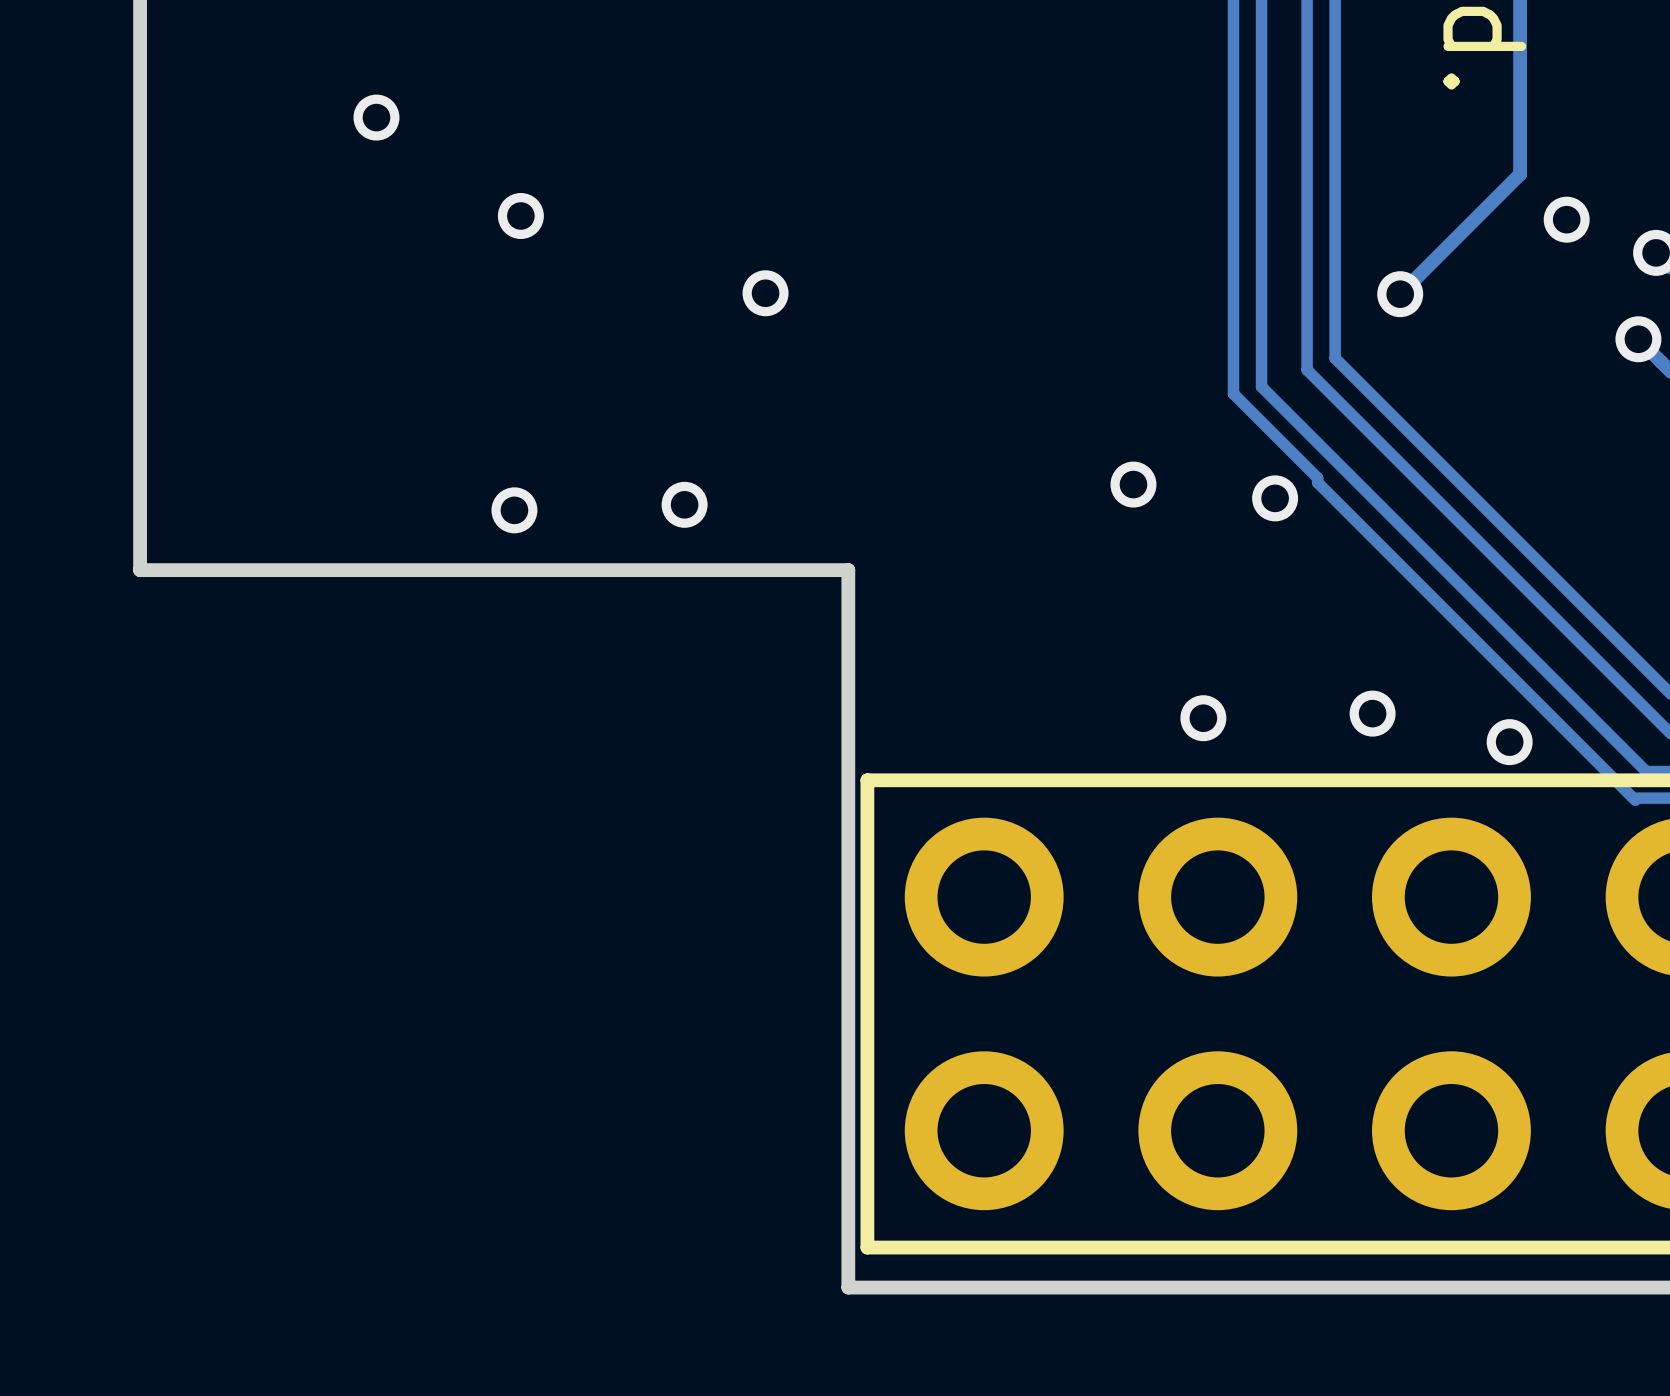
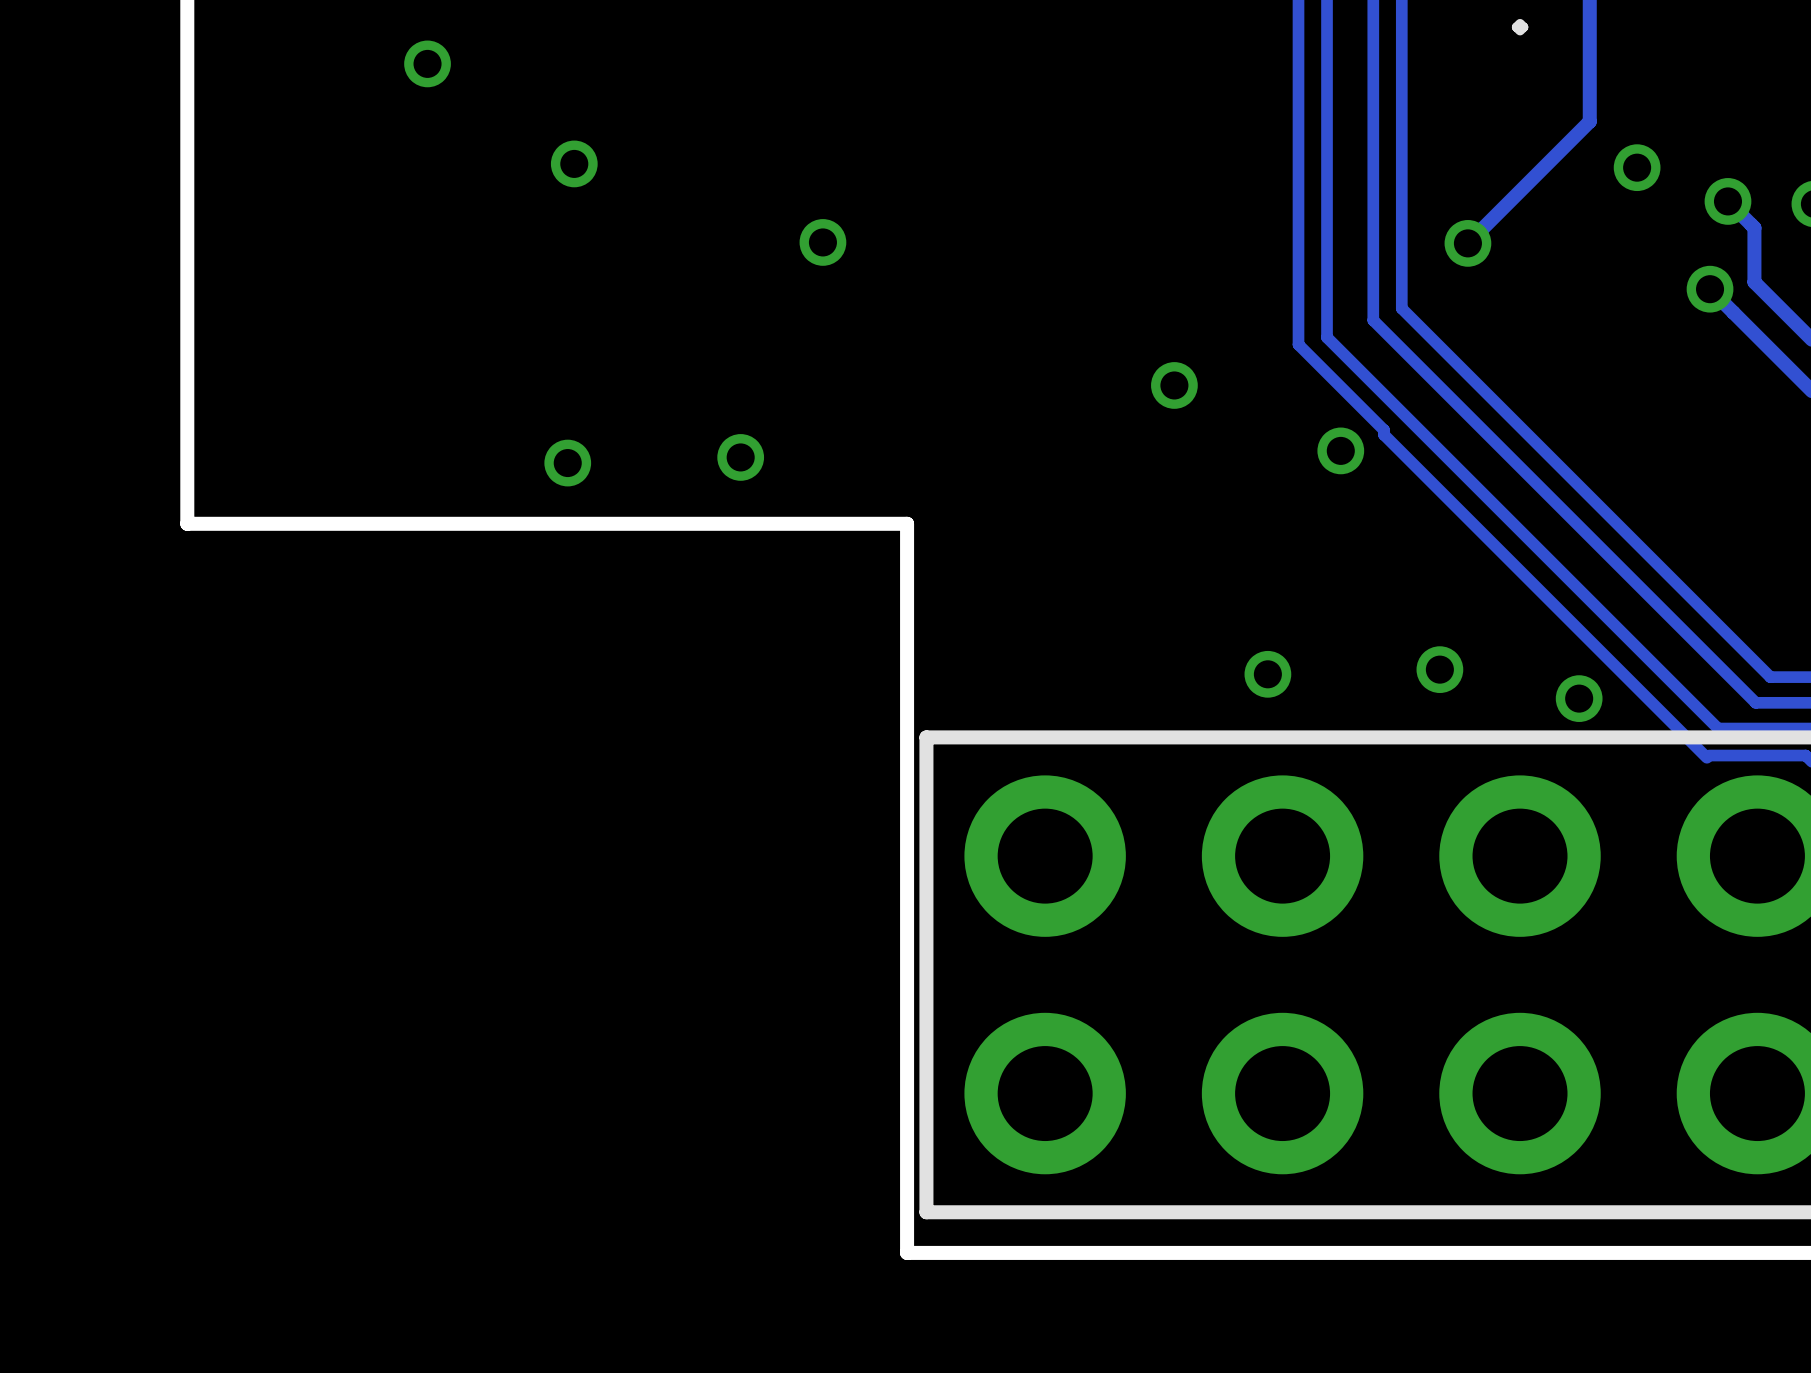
via position: (1133, 484) -> (1174, 385)

